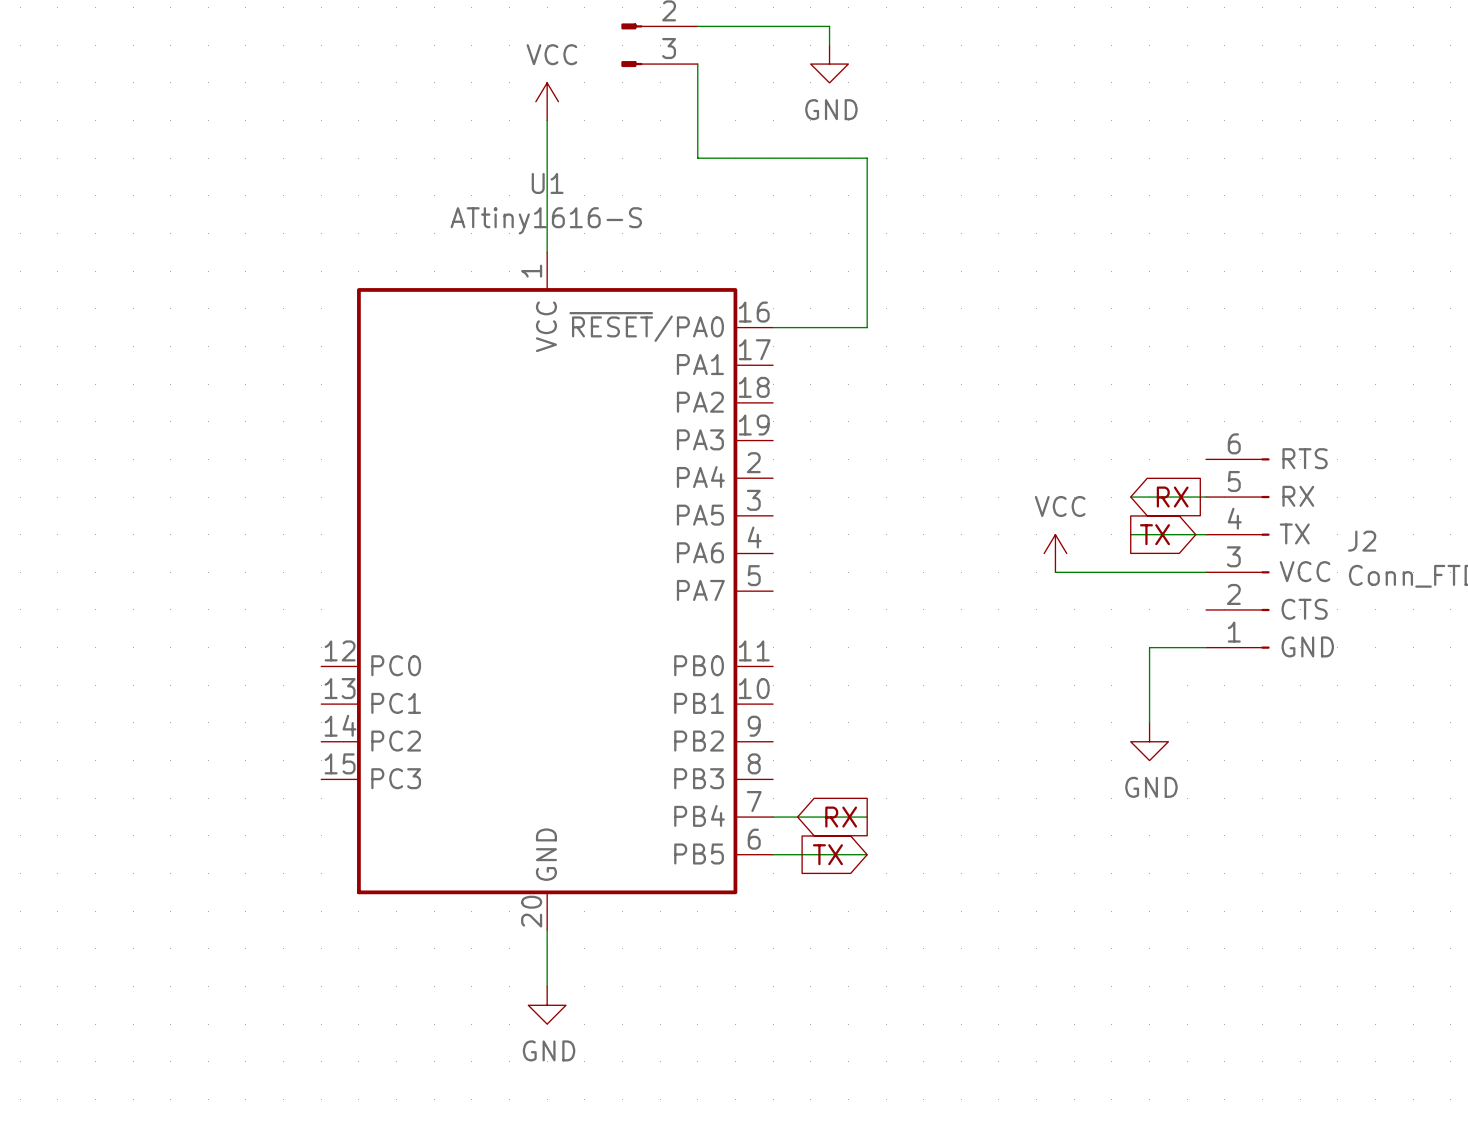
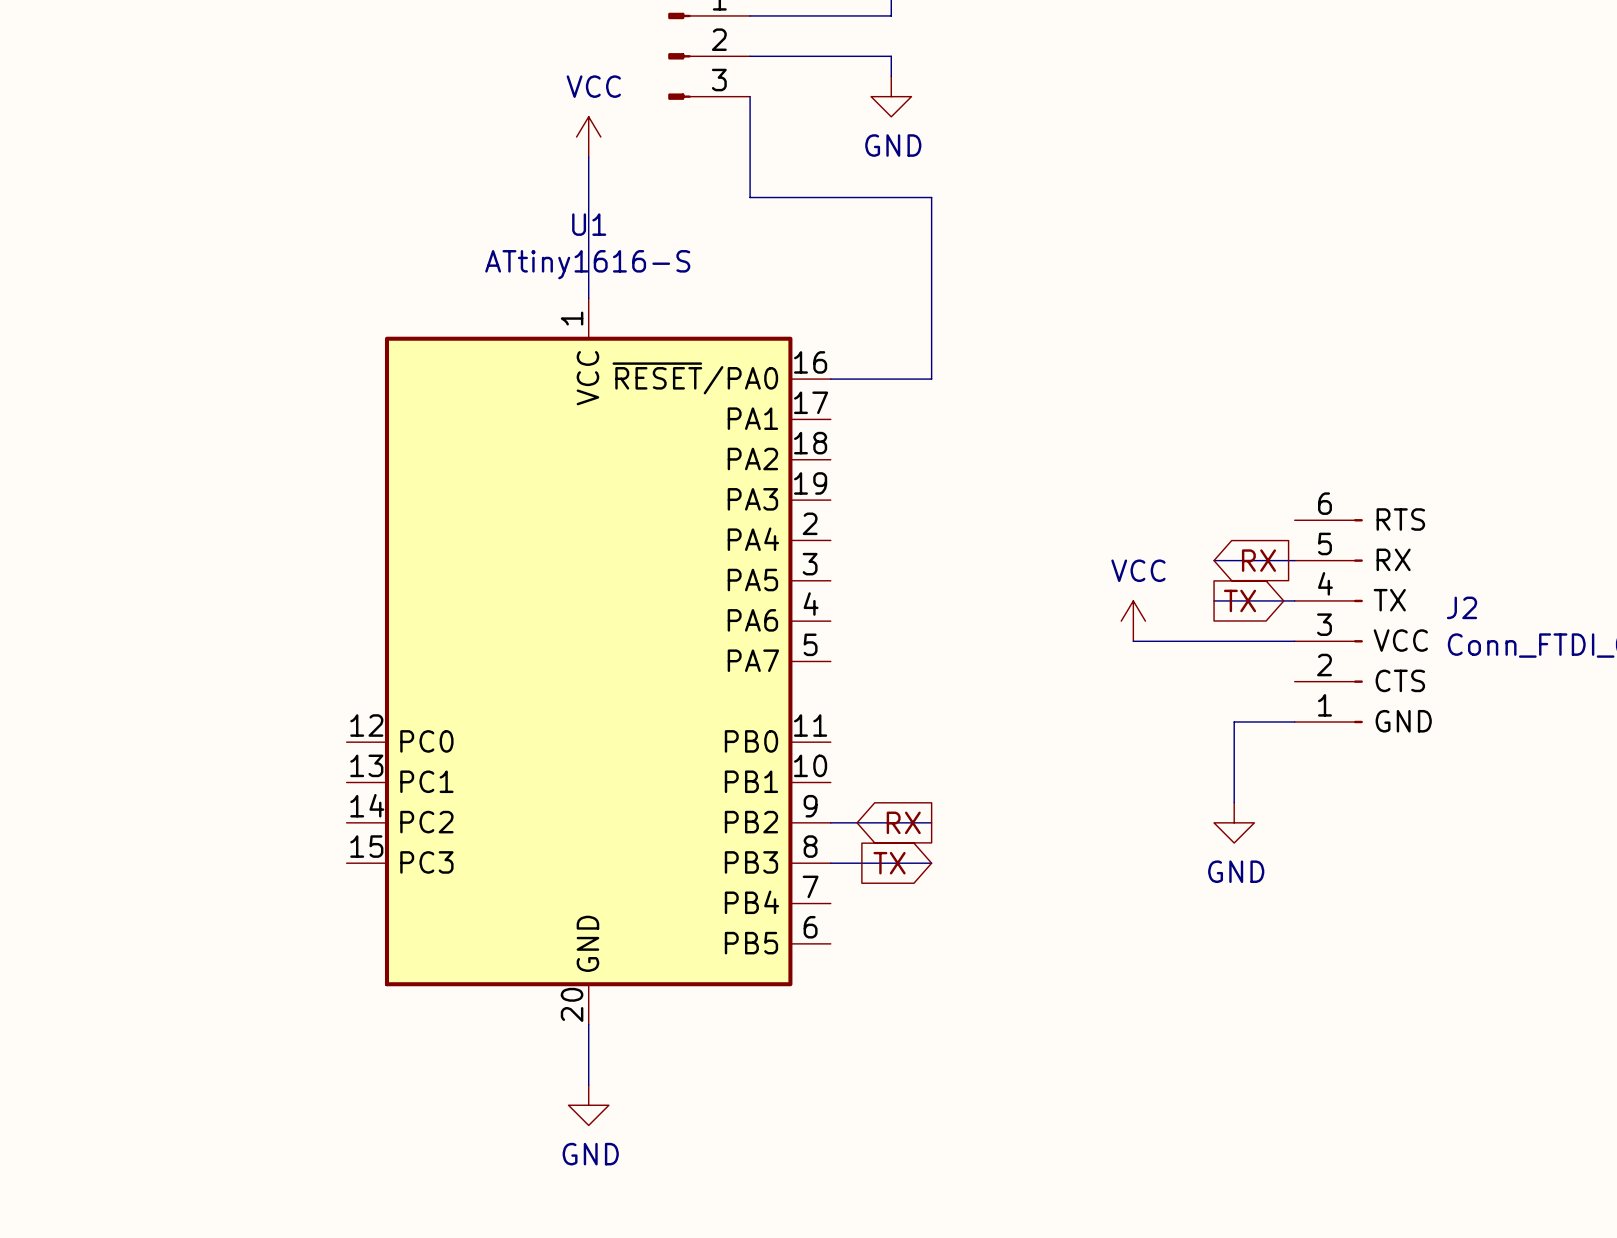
wire: (773, 817) (867, 817) -> (830, 863) (931, 863)
global label position: RX (841, 817) -> RX (903, 822)
wire: (773, 854) (867, 854) -> (830, 822) (931, 822)
global label position: TX (827, 854) -> TX (889, 863)

